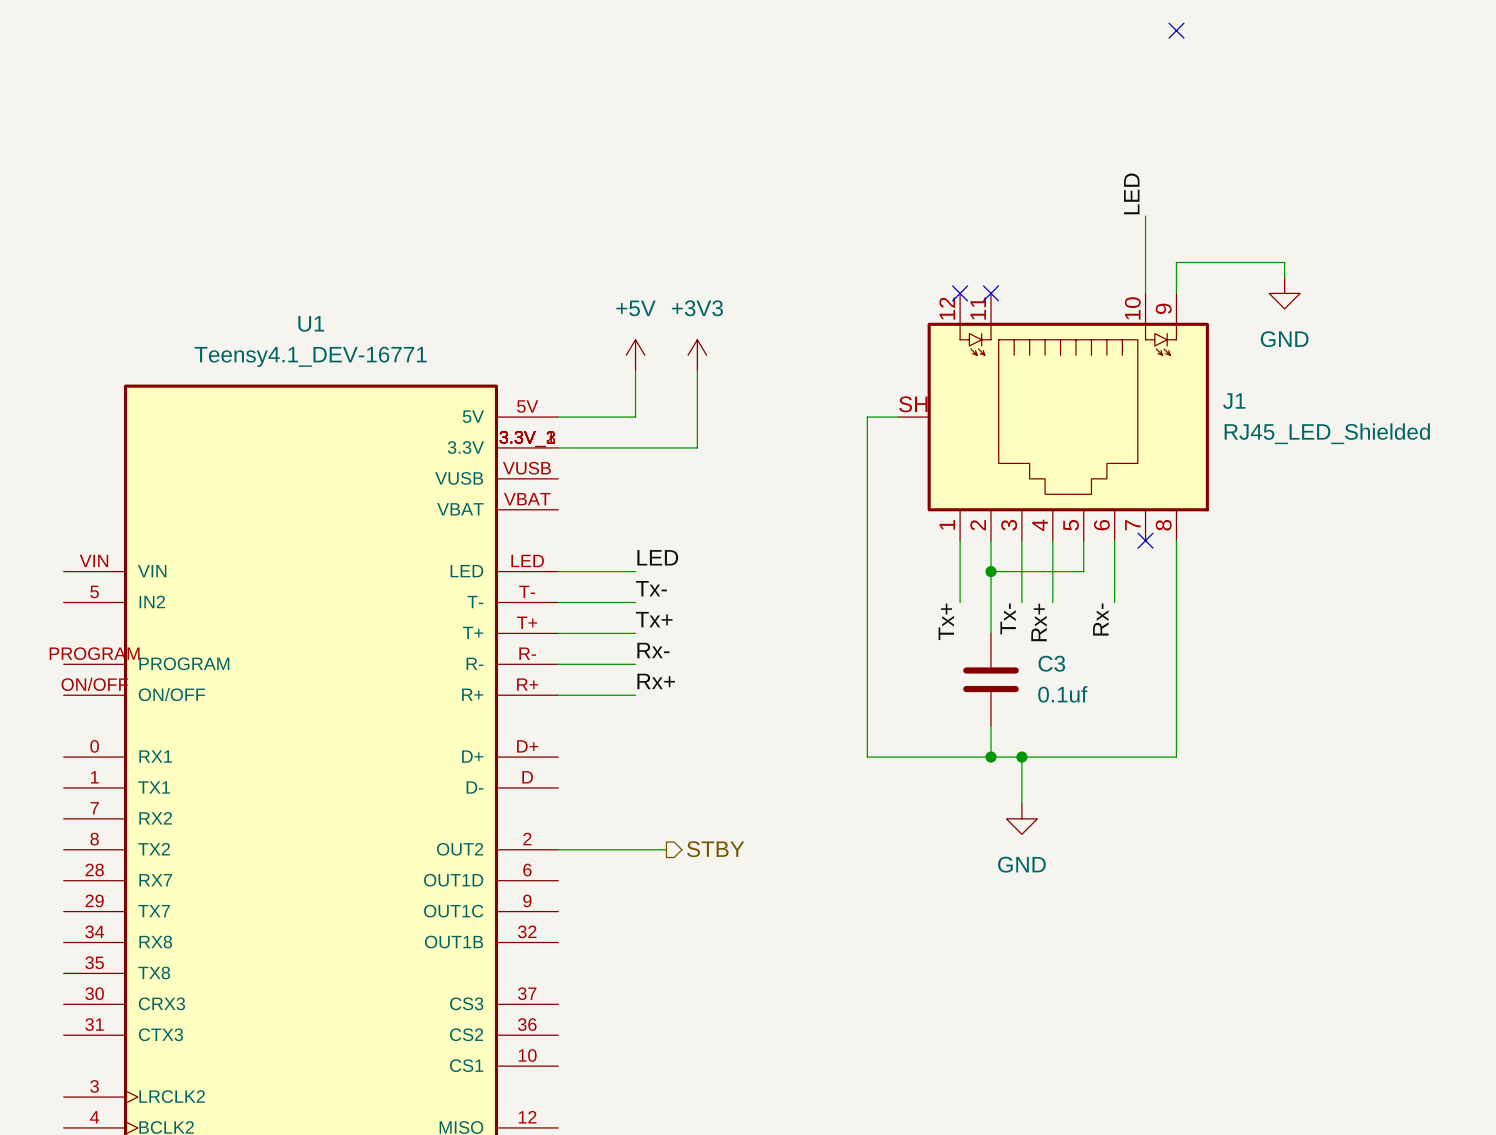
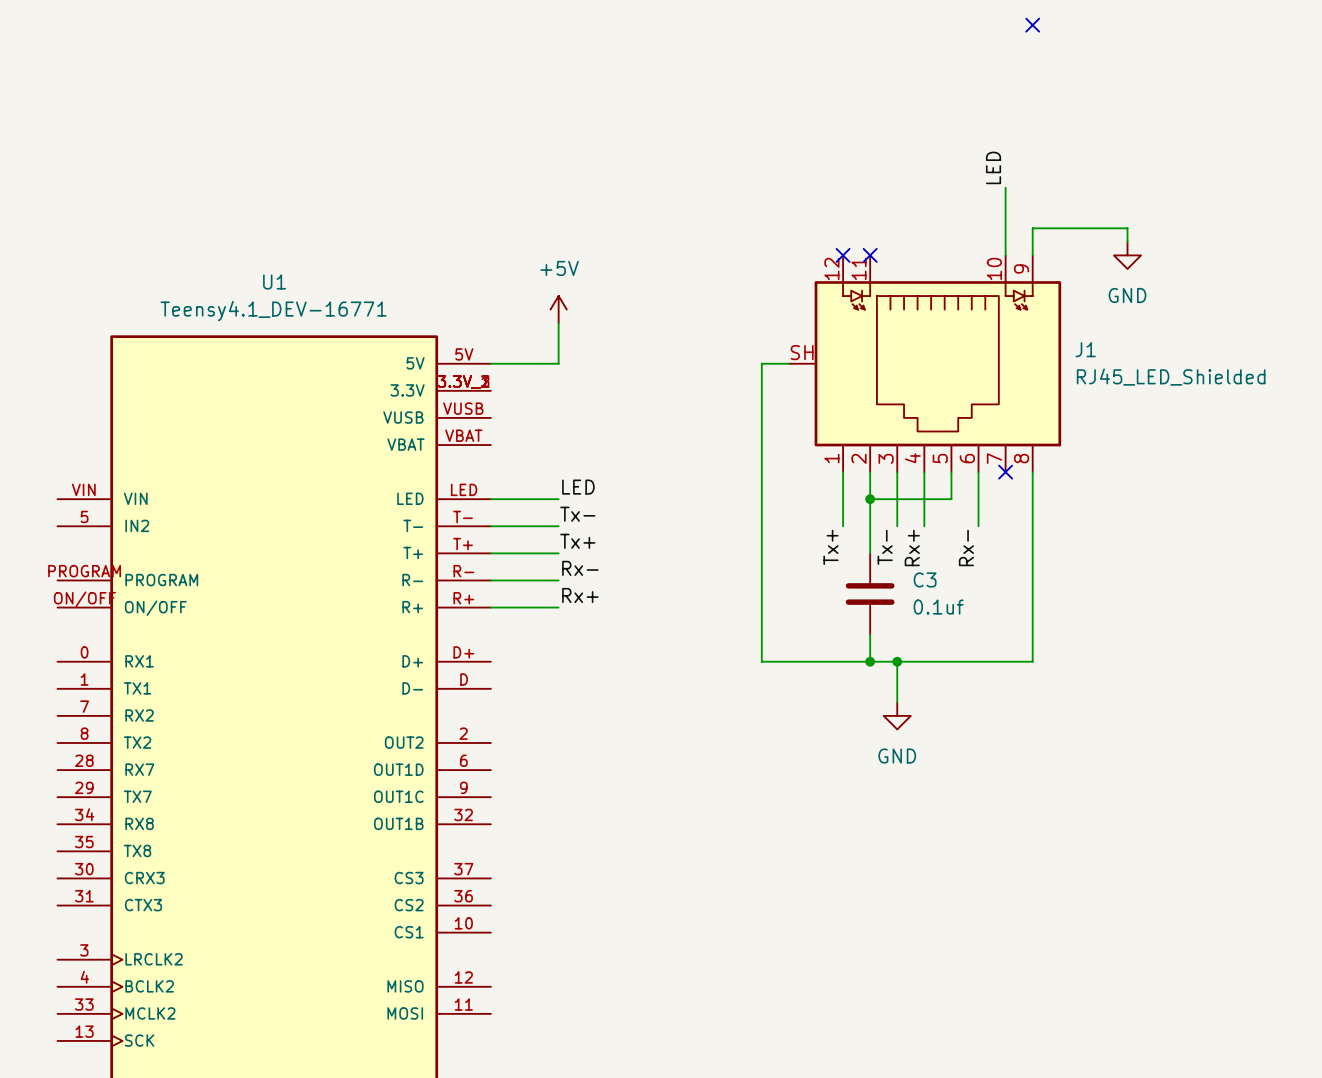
power symbol: +3V3 (697, 355) -> none
wire: (697, 370) (697, 447) (558, 447) -> none
wire: (558, 849) (666, 849) -> none
hierarchical label: STBY (715, 849) -> none

